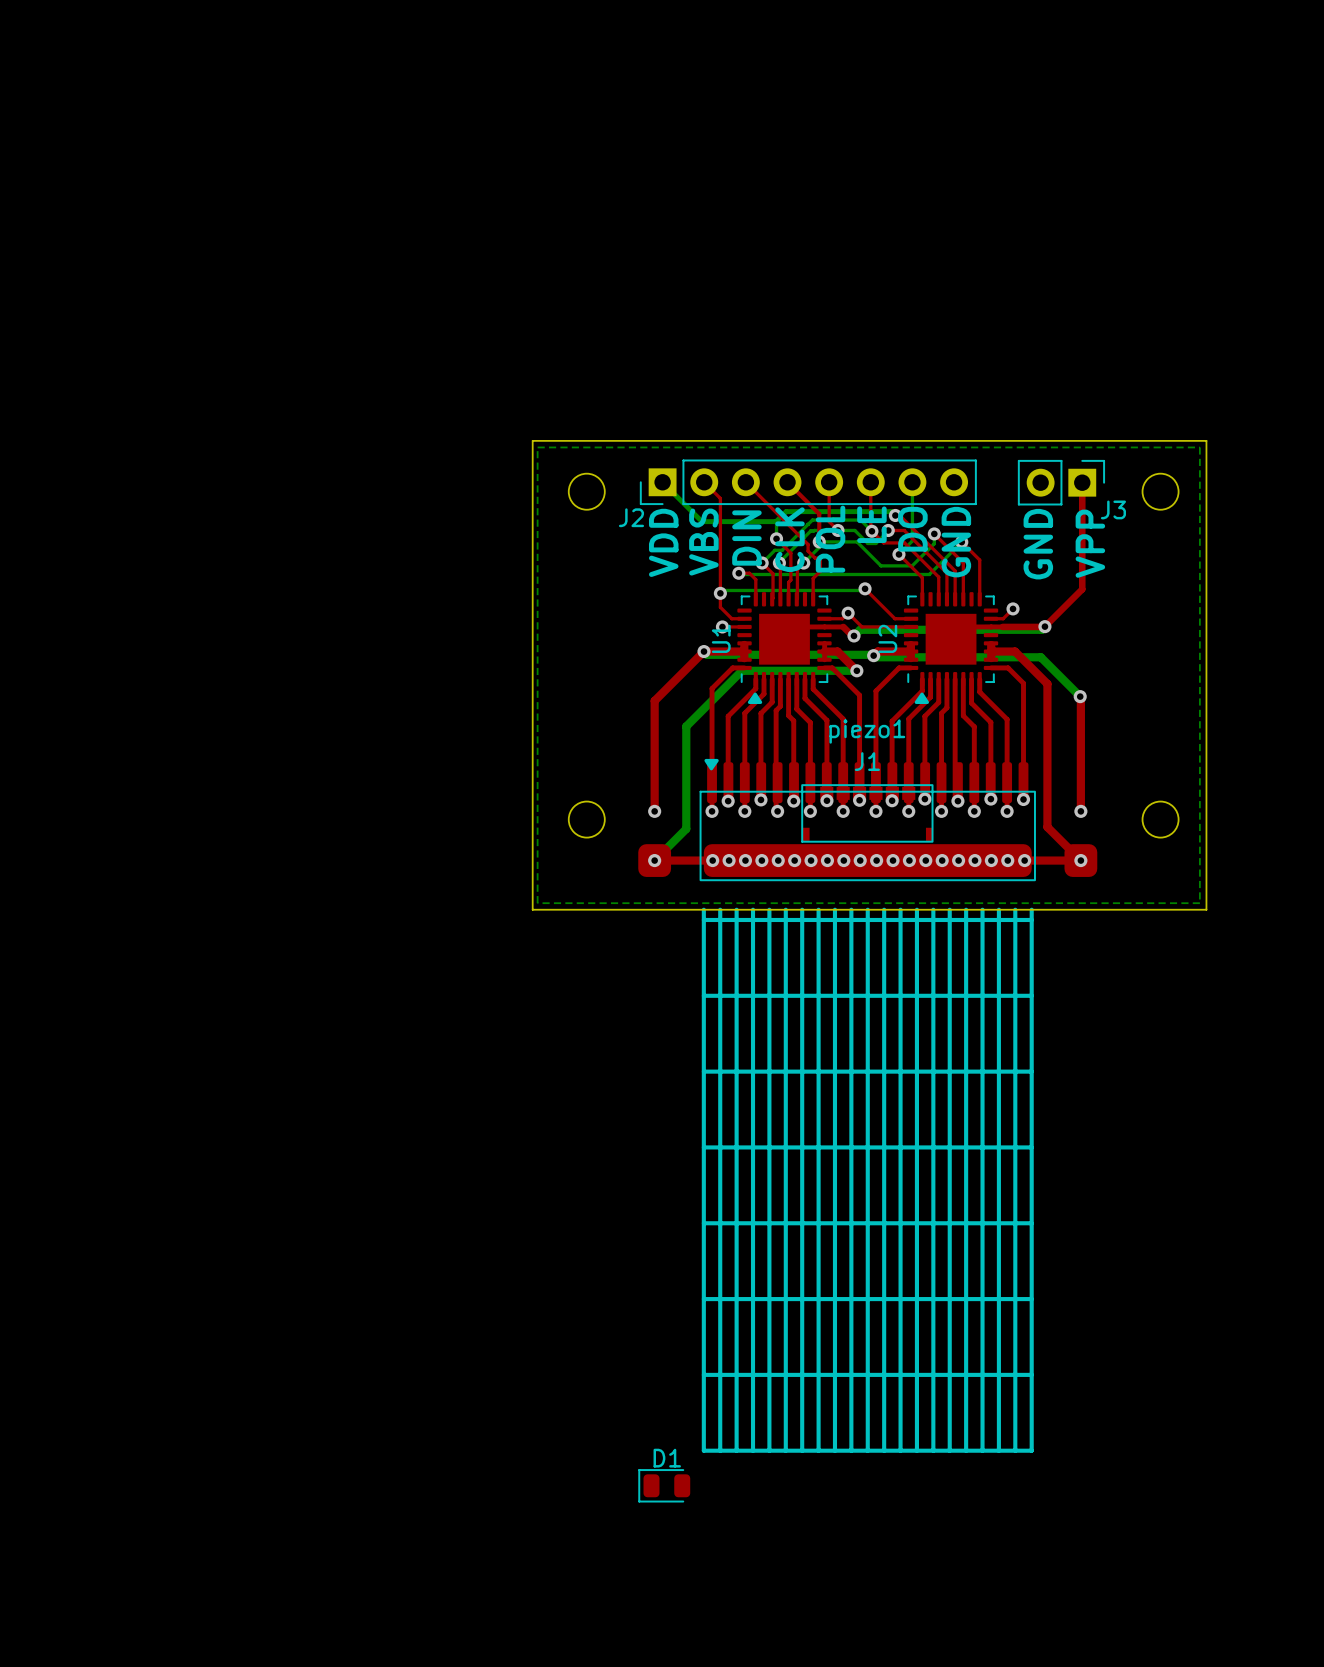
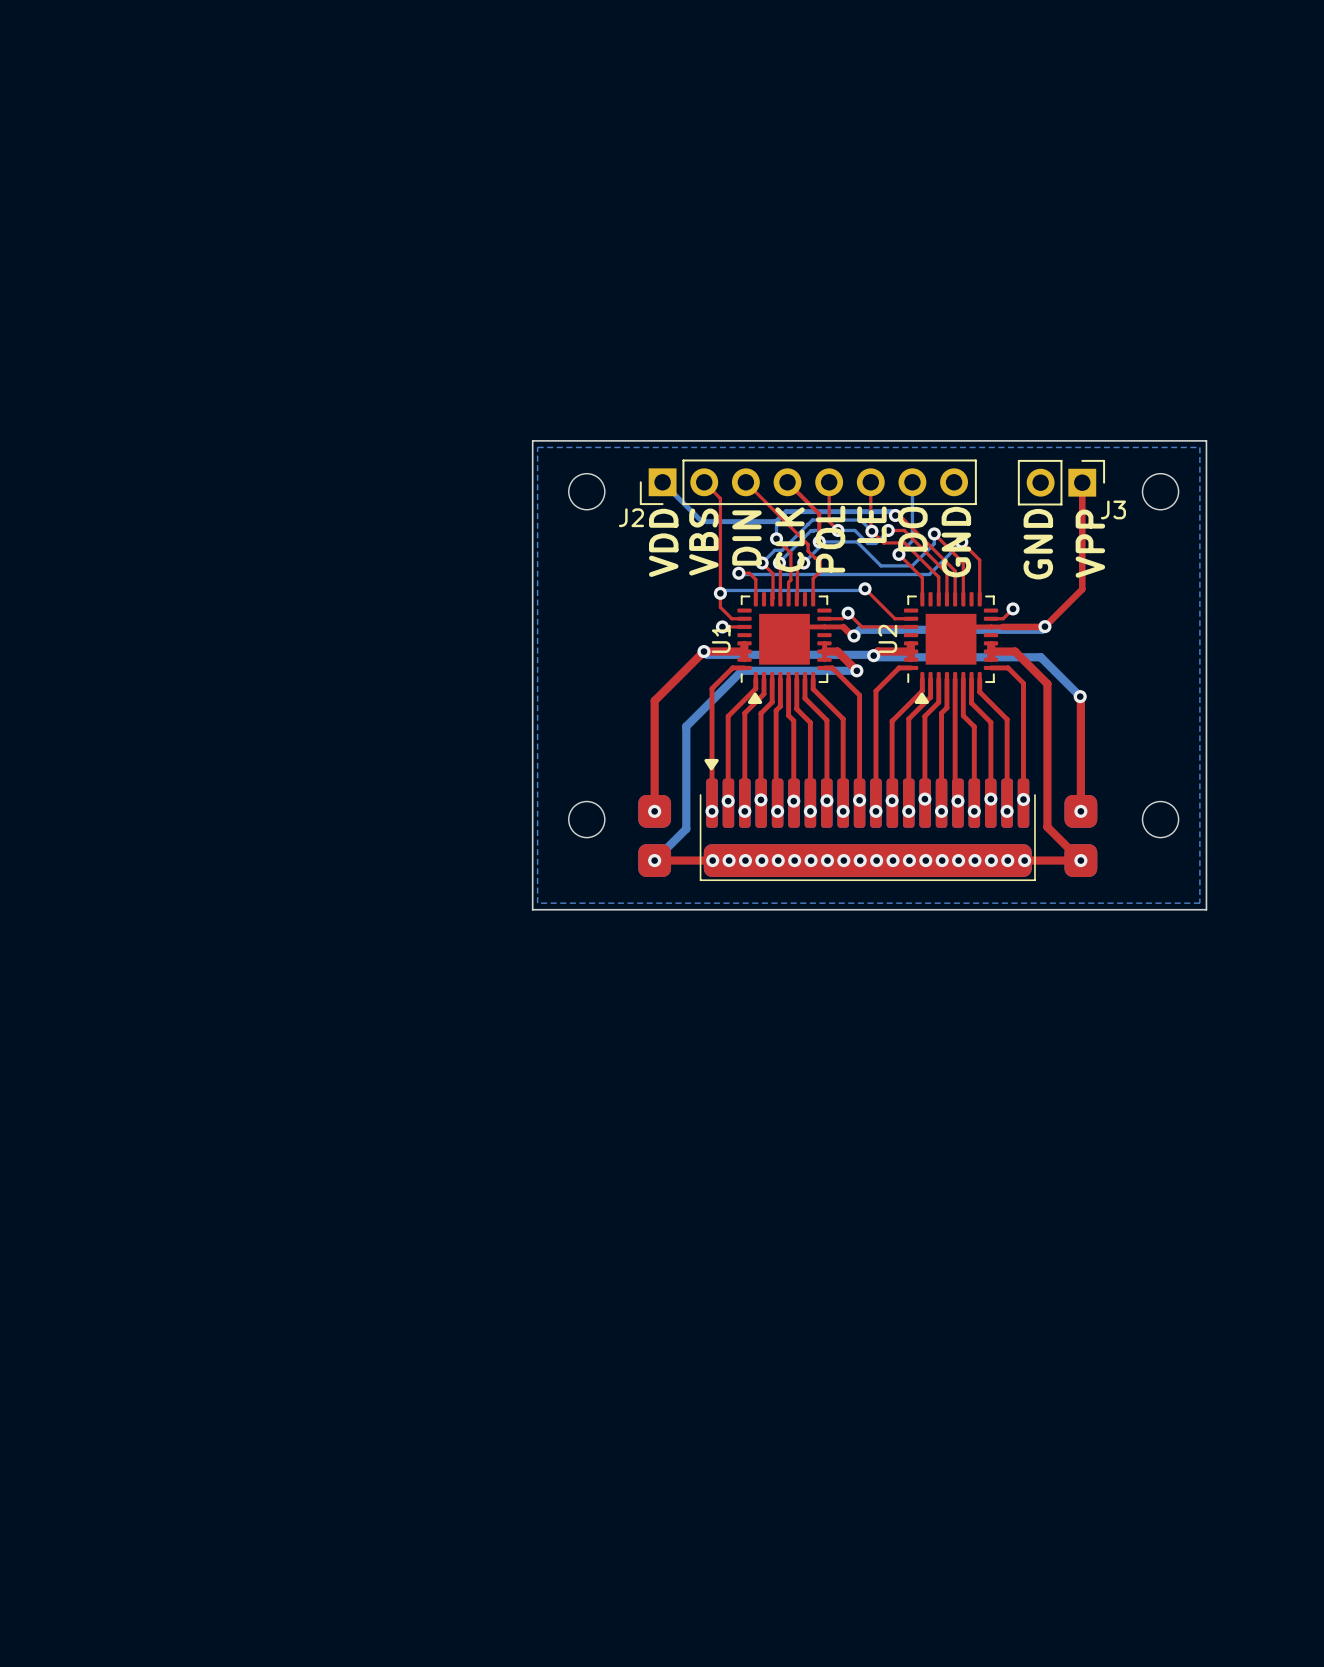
J1: (867, 813) -> none
part: none -> (867, 829)
piezo1: (867, 1107) -> none
D1: (664, 1485) -> none

